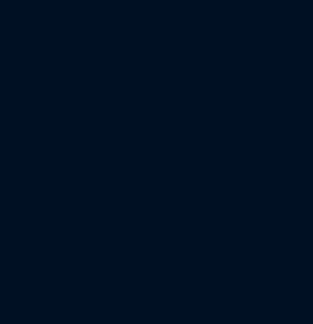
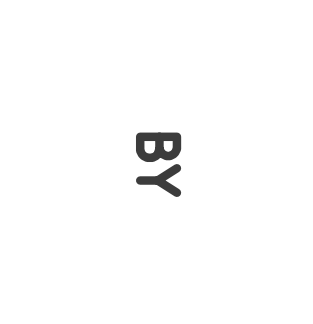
text: none -> BY (158, 164)

